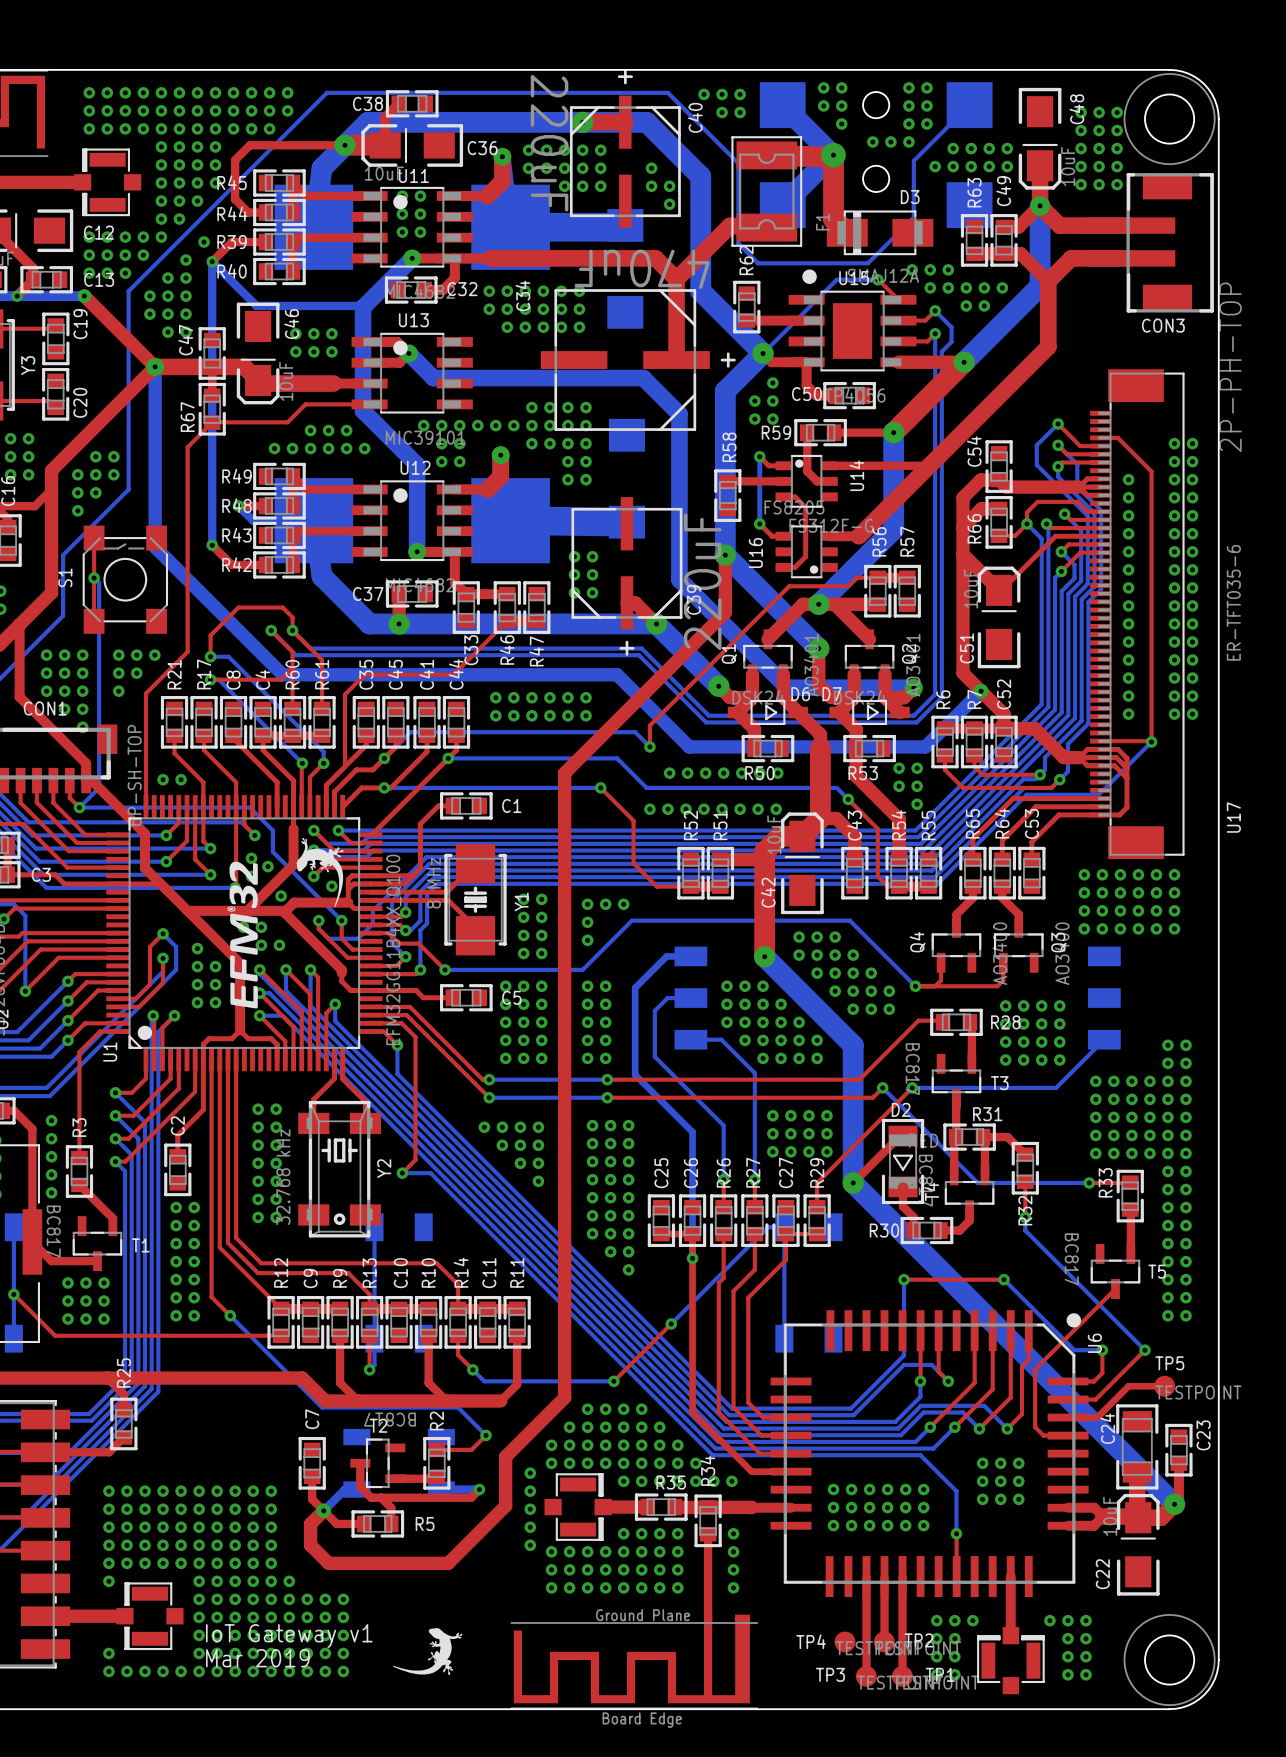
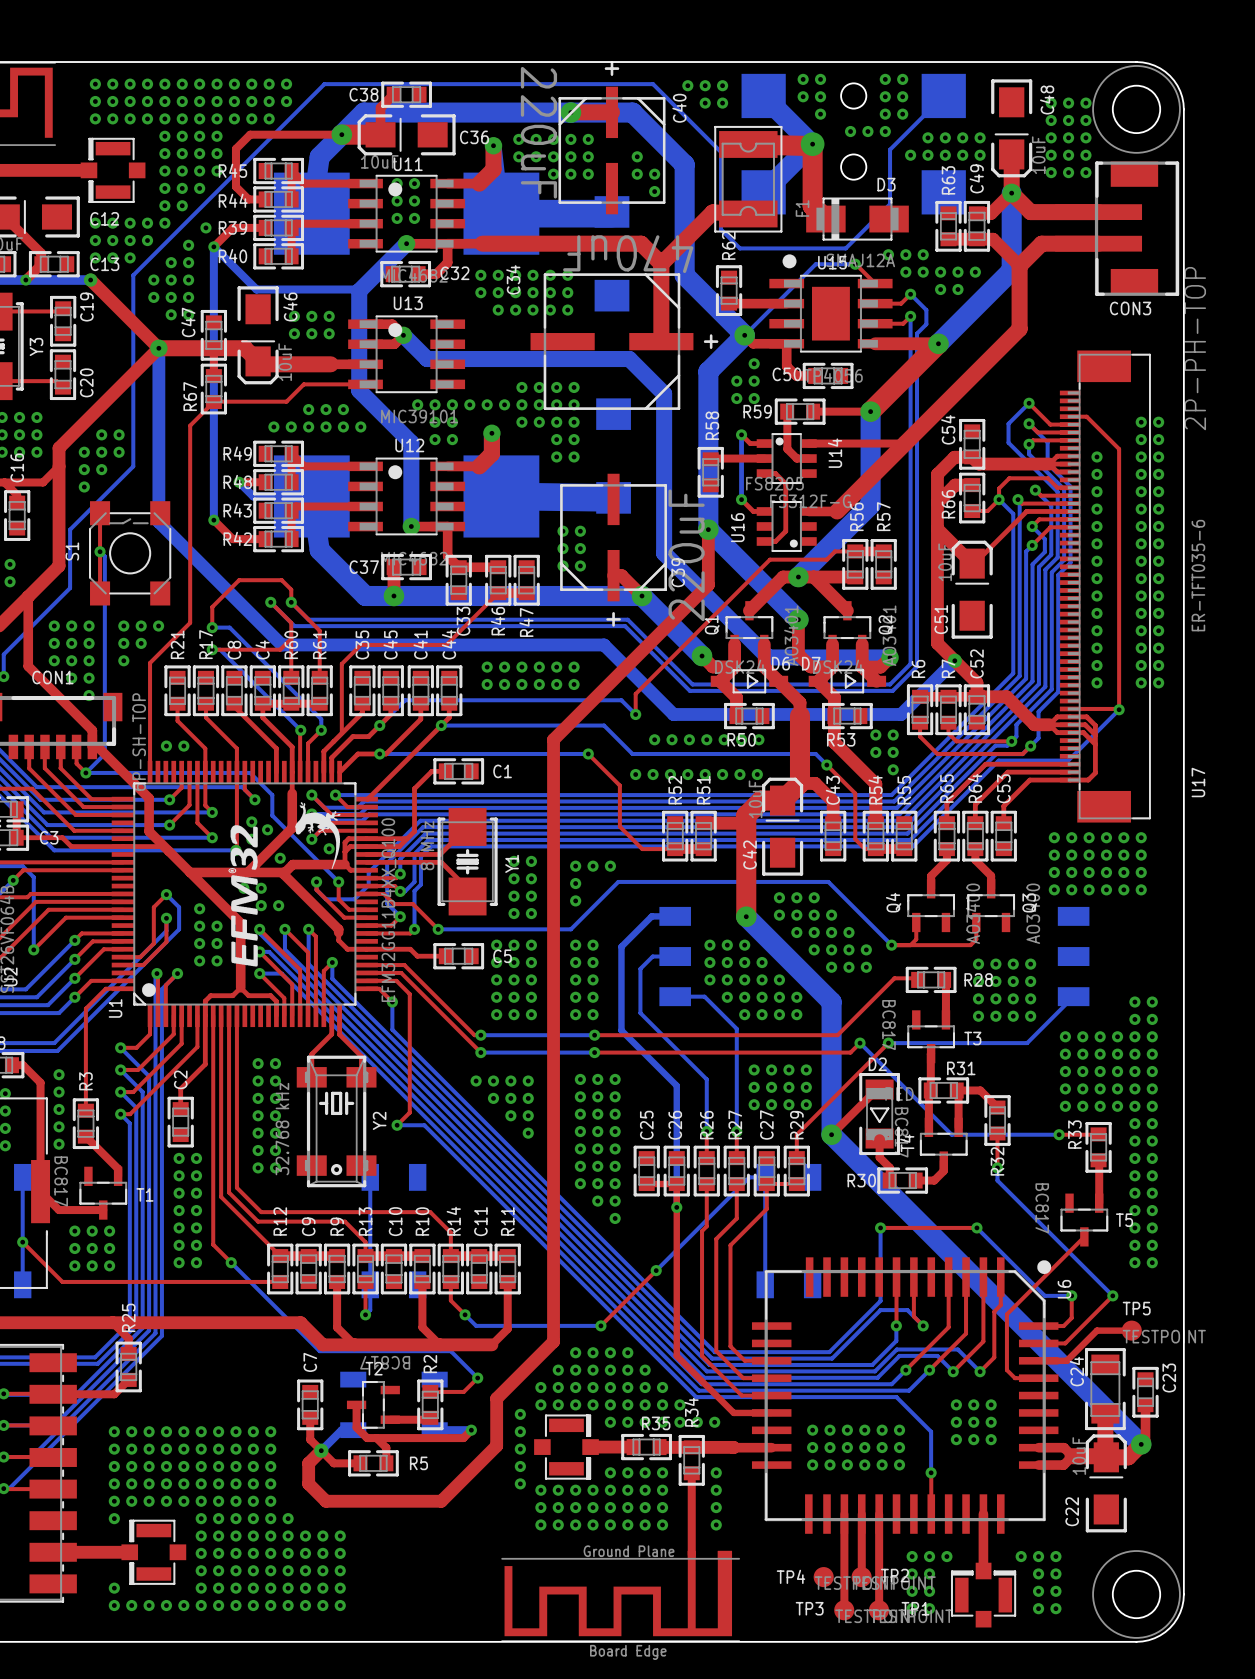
drawing: [392, 1628, 463, 1676] -> none
text: IoT Gateway v1 (289, 1636) -> none
text: Mar 2019 (257, 1658) -> none

